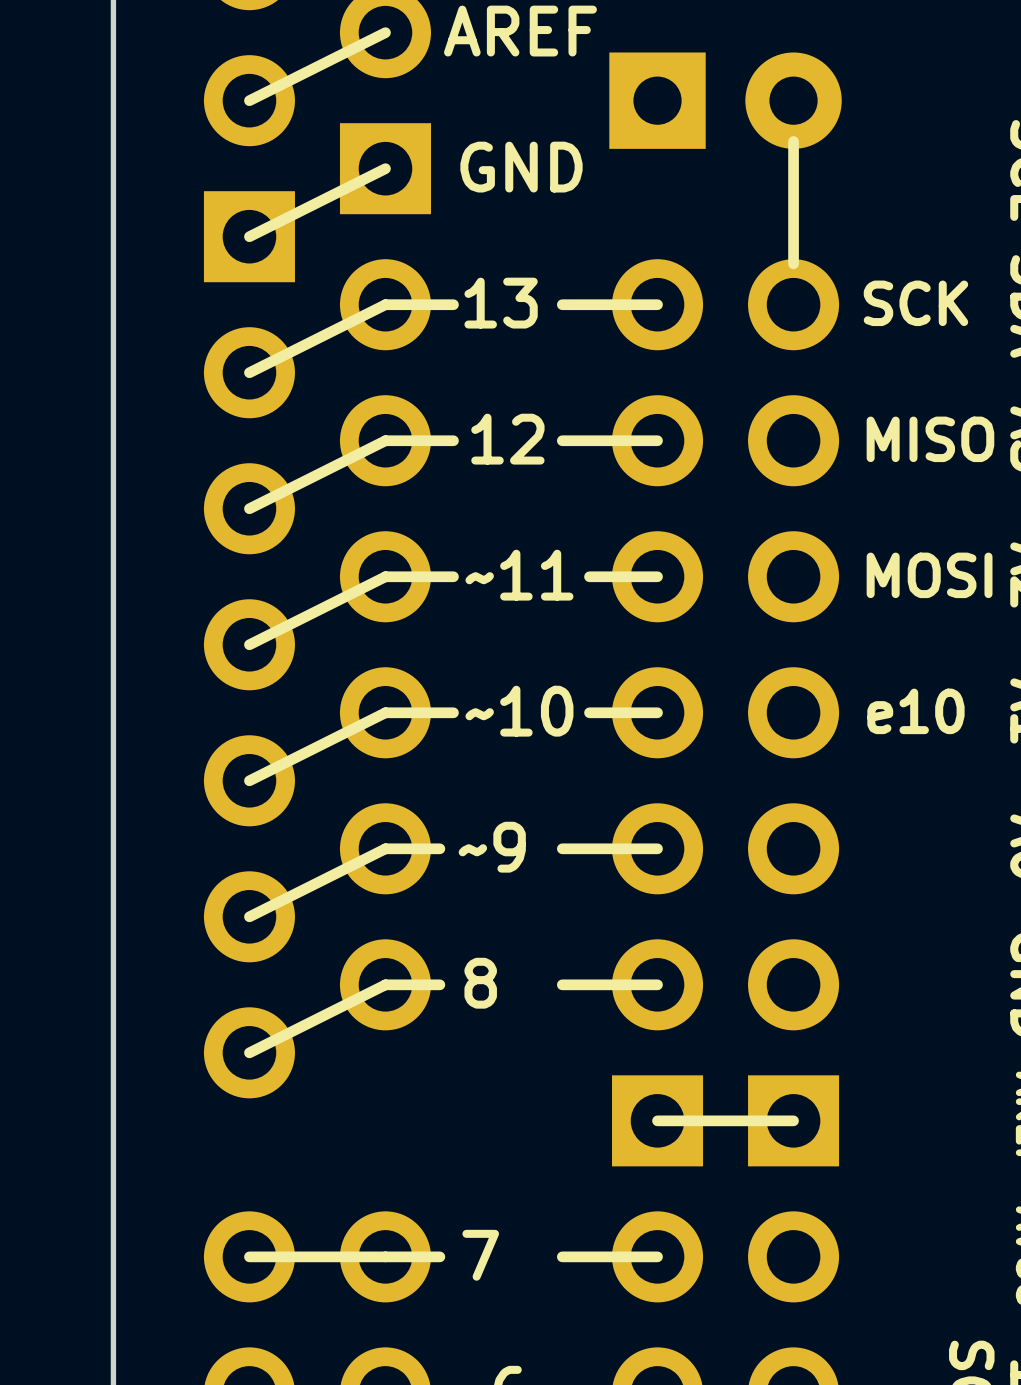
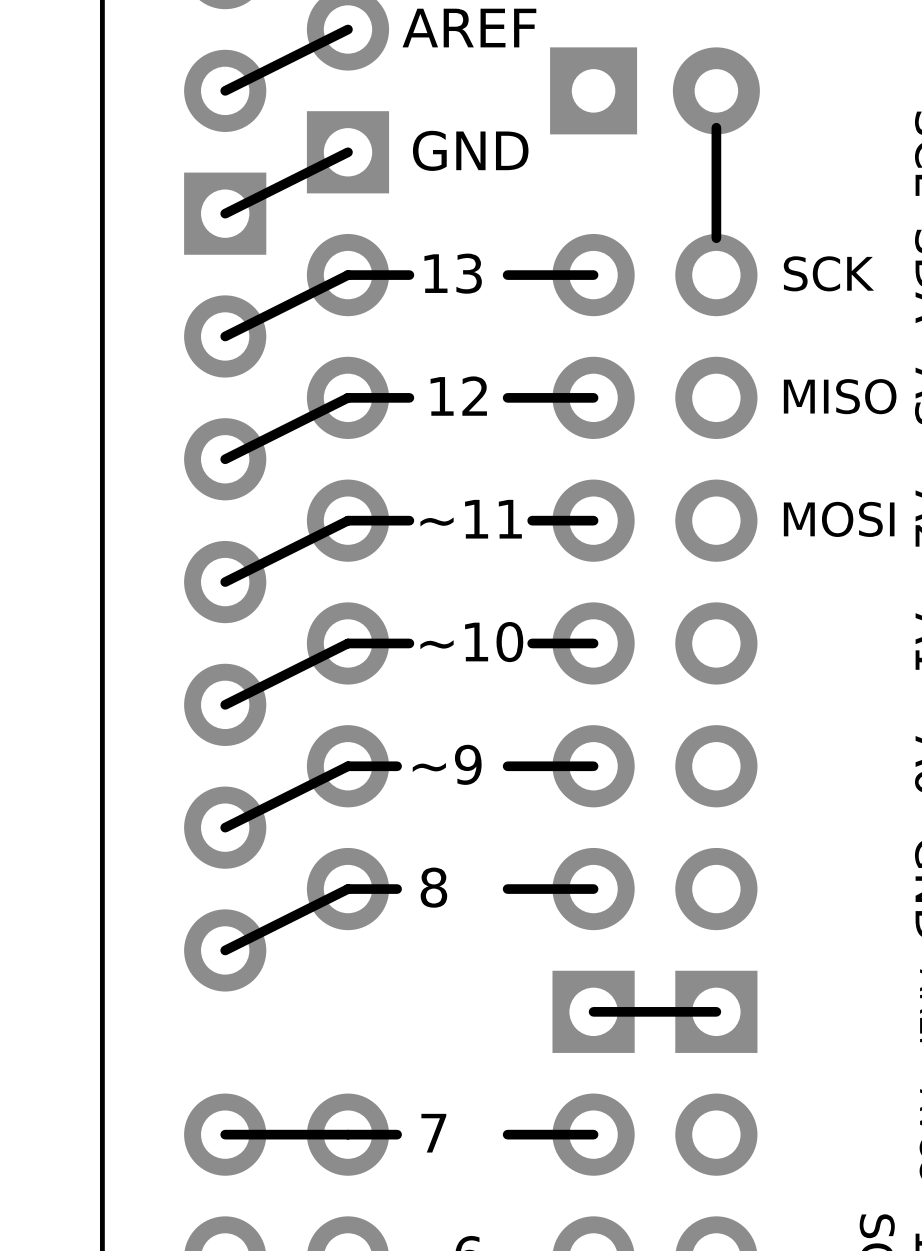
text: e10 (915, 711) -> none

